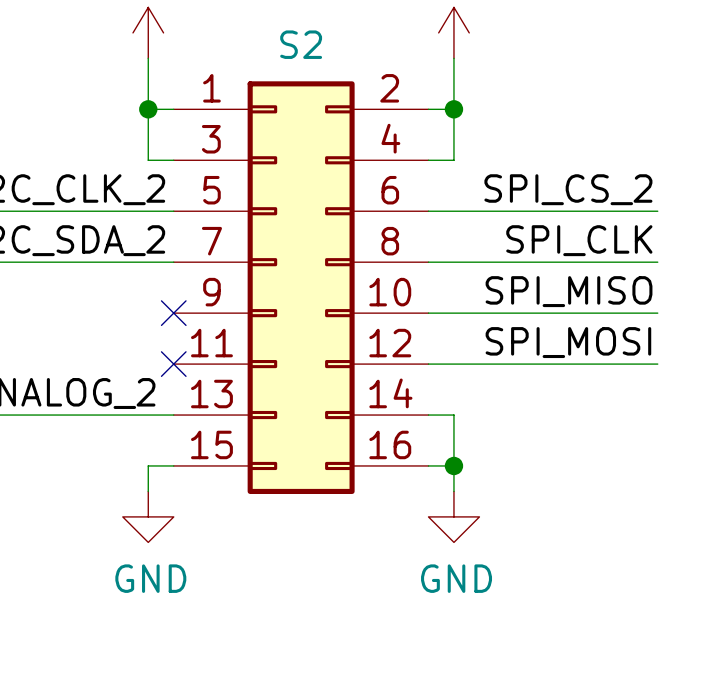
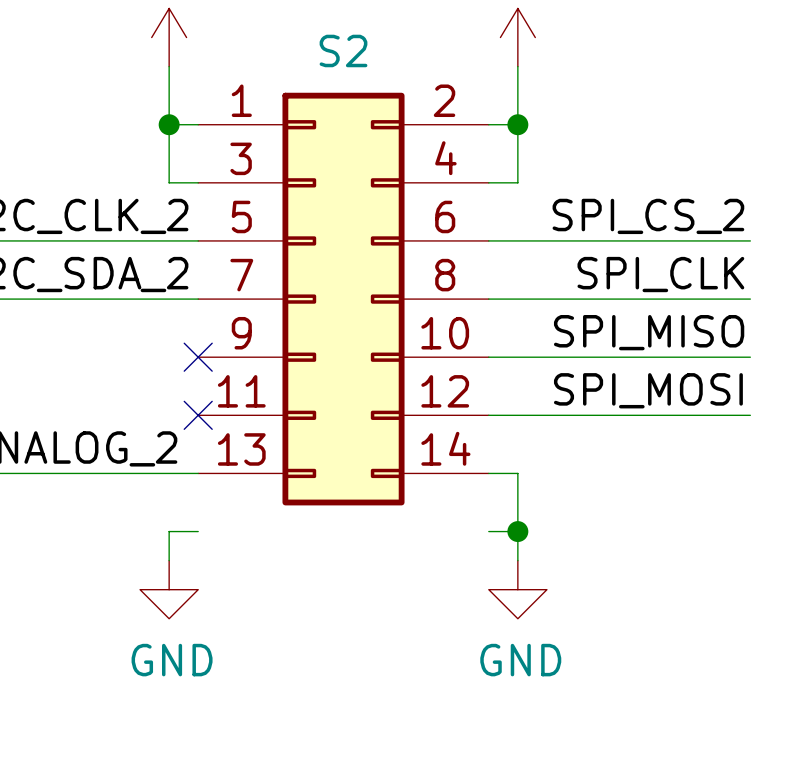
S2 symbol: [173, 81, 429, 495] -> [198, 92, 489, 506]

